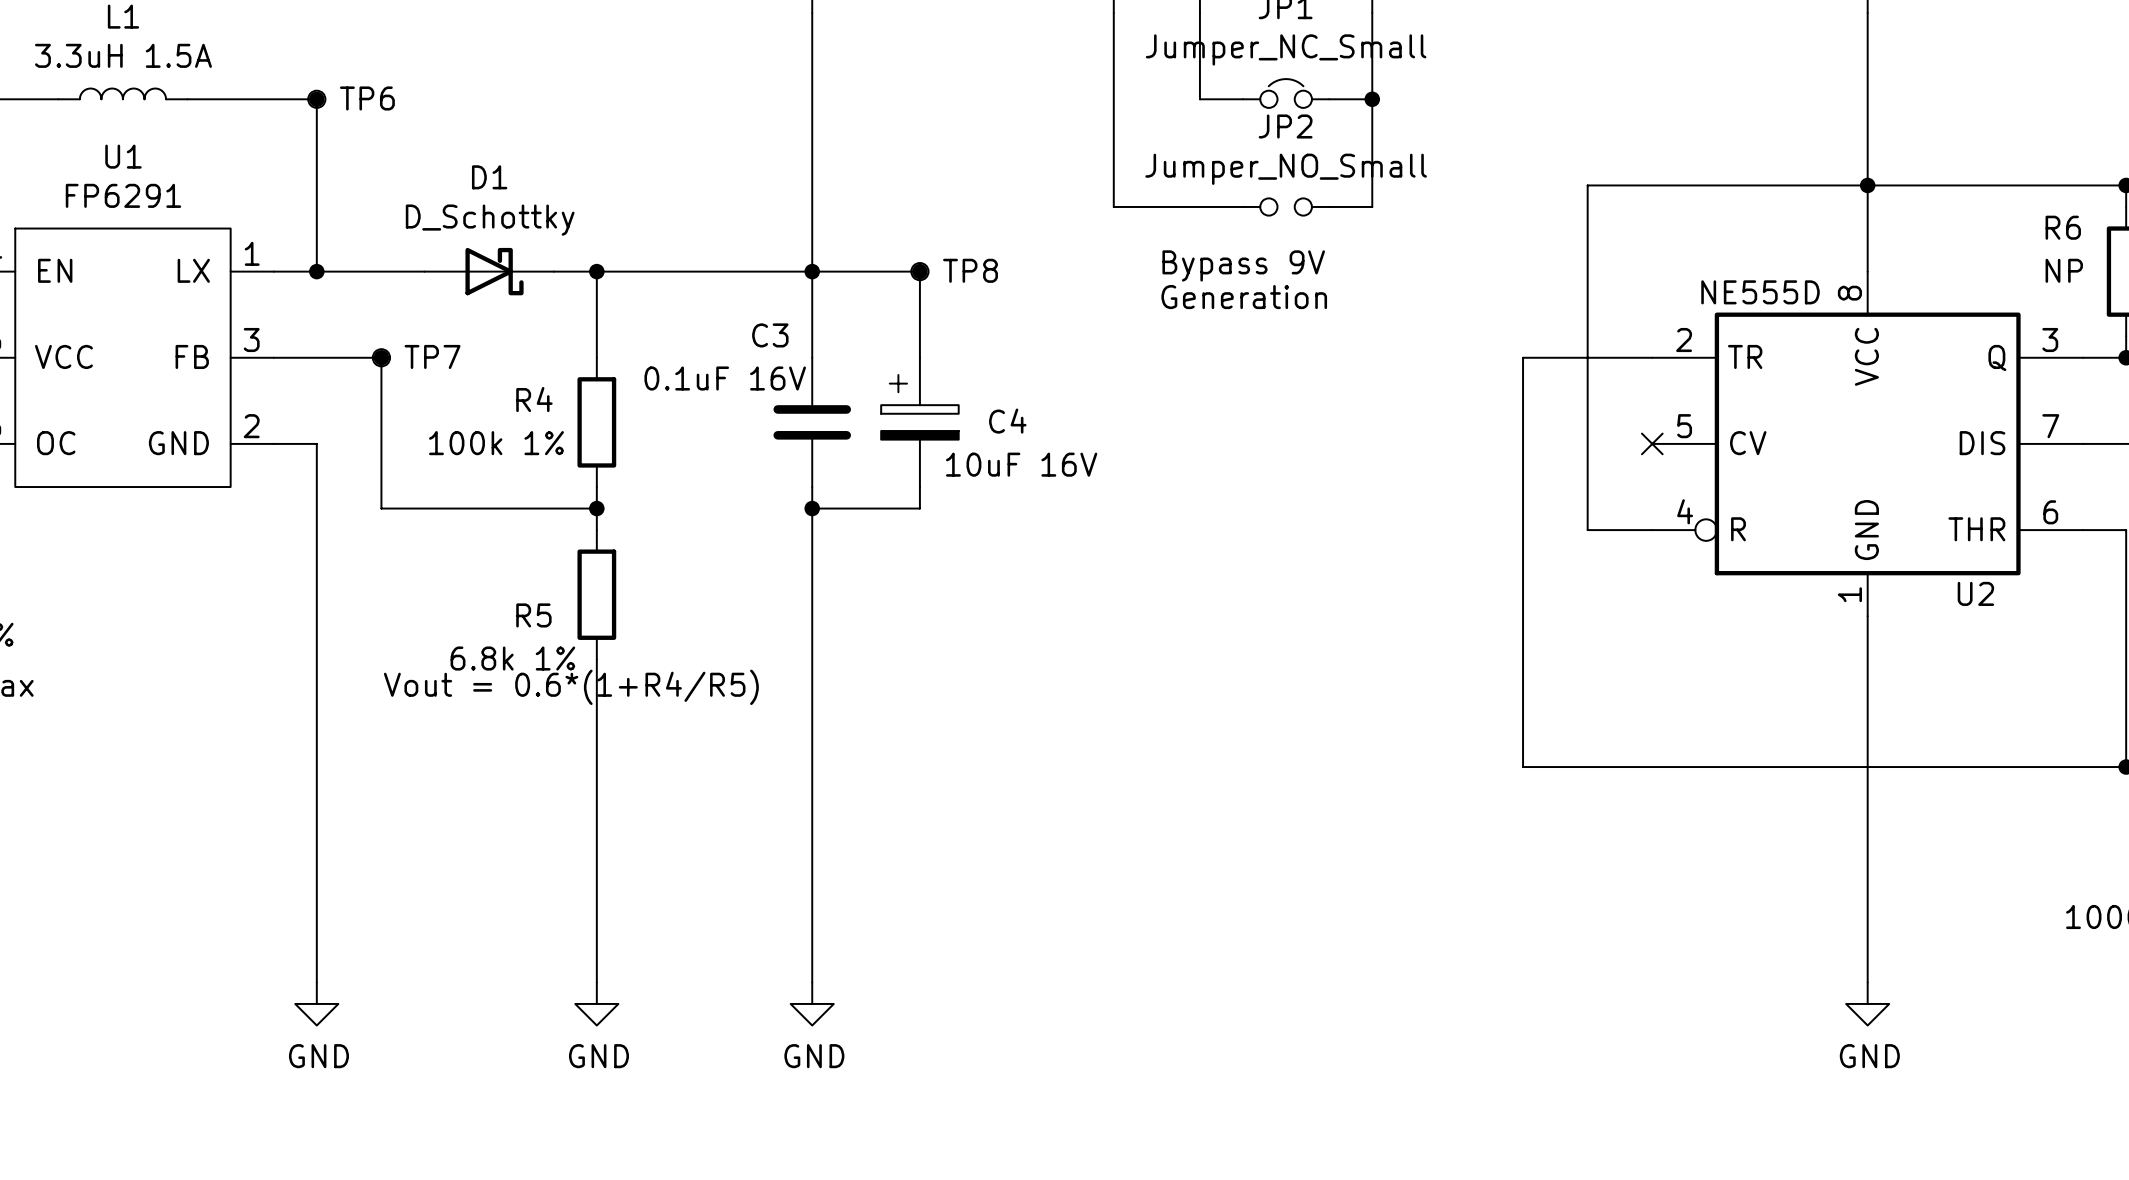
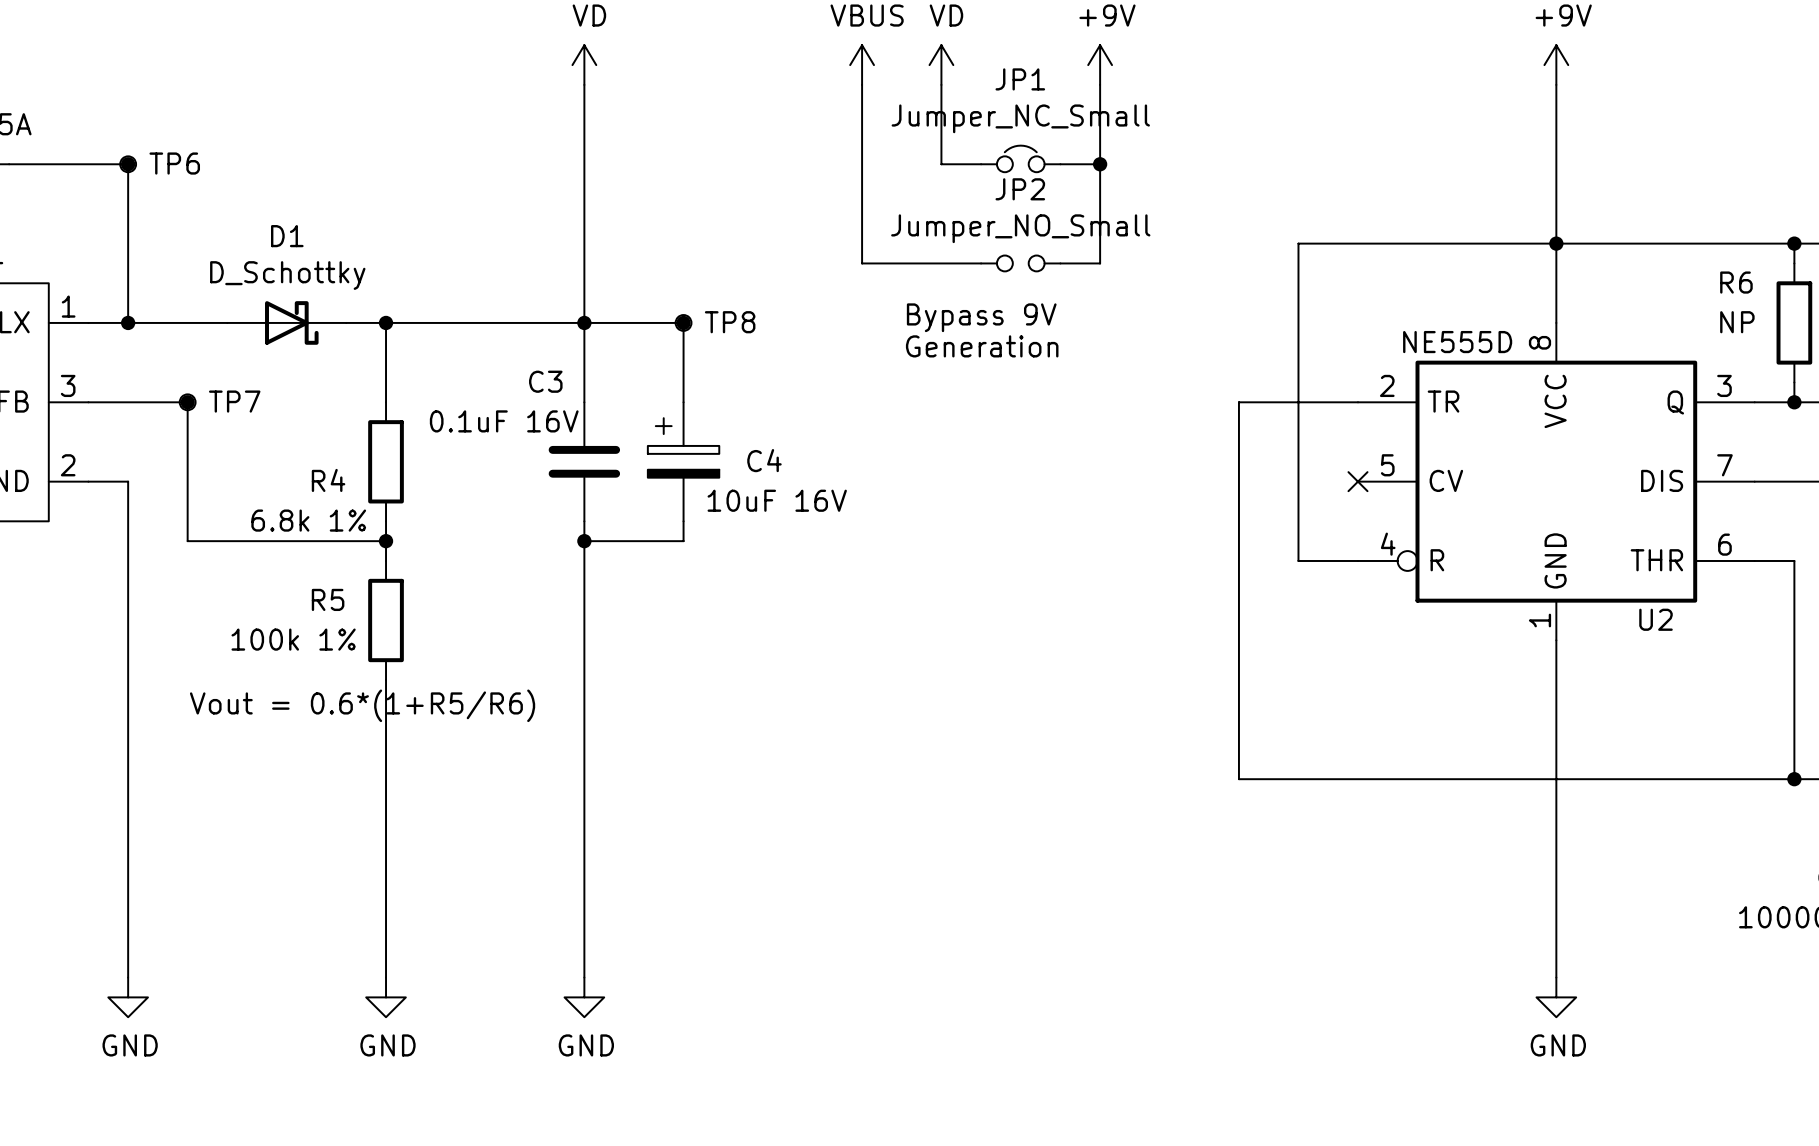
R4 name position: R4 (534, 399) -> R4 (328, 480)
R4 value: 100k 1% (496, 443) -> 6.8k 1% (308, 520)
R5 name position: R5 (533, 615) -> R5 (328, 599)
R5 value: 6.8k 1% (512, 658) -> 100k 1% (293, 639)
text: Vout = 0.6*(1+R4/R5) (571, 687) -> Vout = 0.6*(1+R5/R6) (362, 705)

